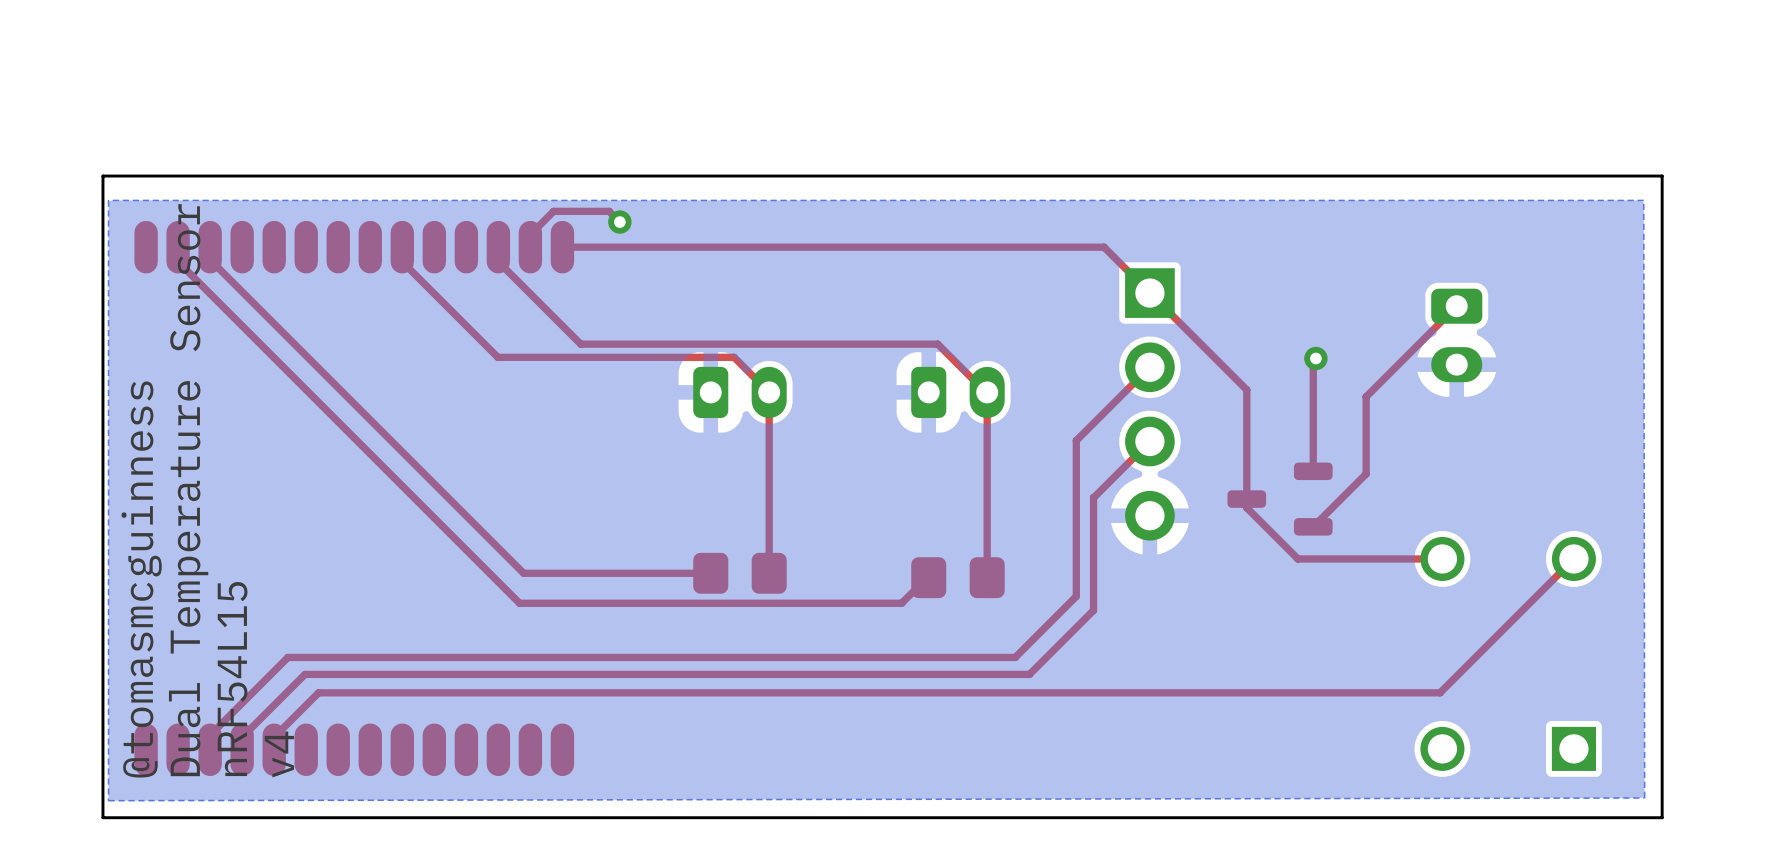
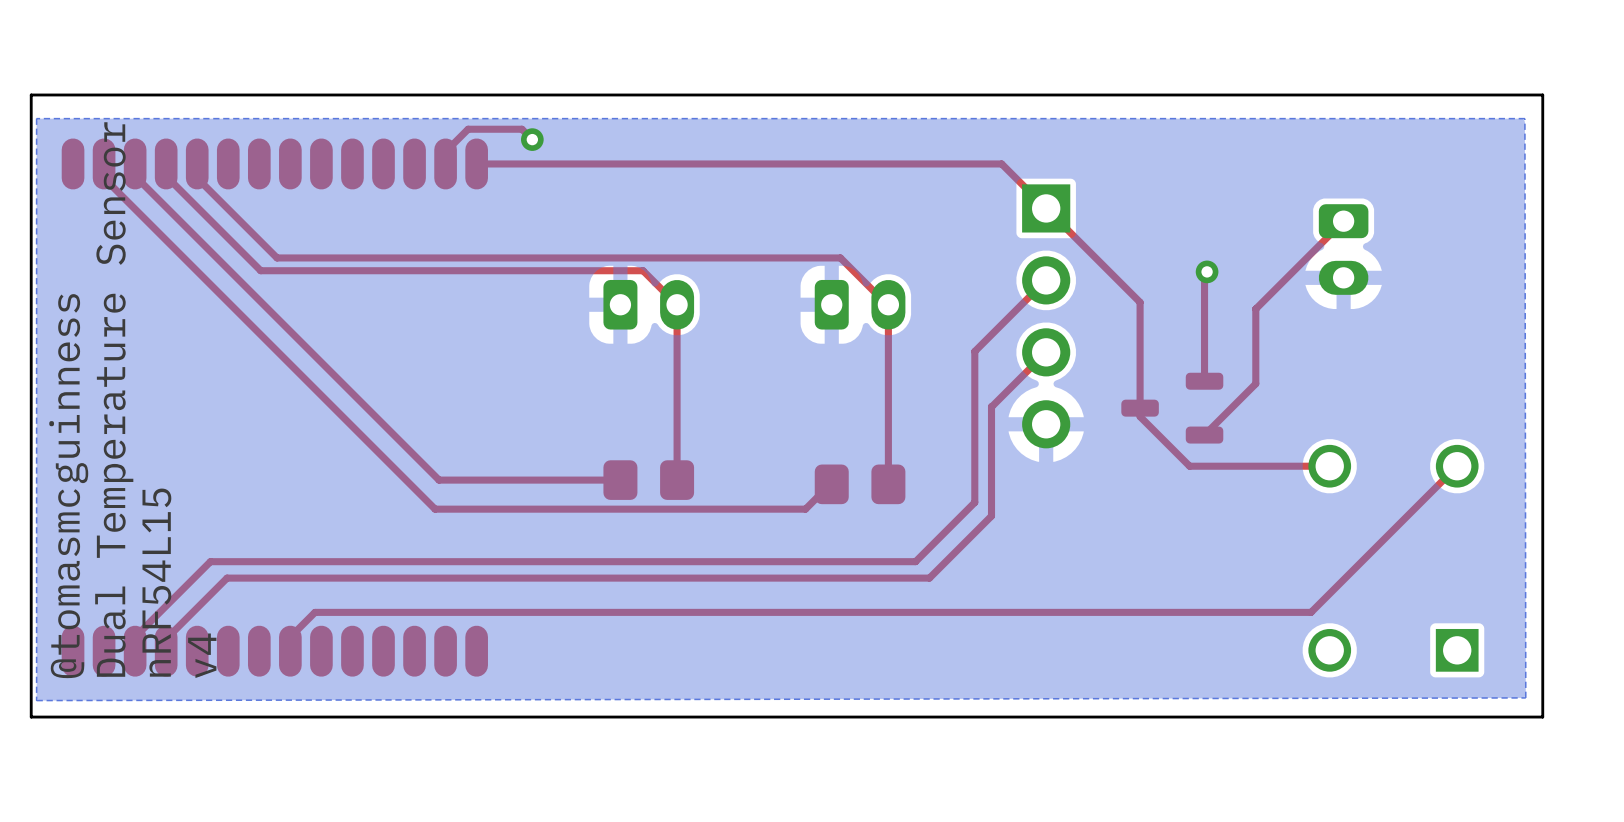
top track: (402, 261) (497, 357) -> (166, 163) (166, 176) (260, 270) (414, 270)
top track: (498, 261) (580, 344) -> (197, 163) (197, 178) (277, 257) (494, 257)
top track: (1440, 692) (318, 692) (274, 737) -> (1327, 595) (1311, 612) (315, 612) (290, 637) (290, 651)

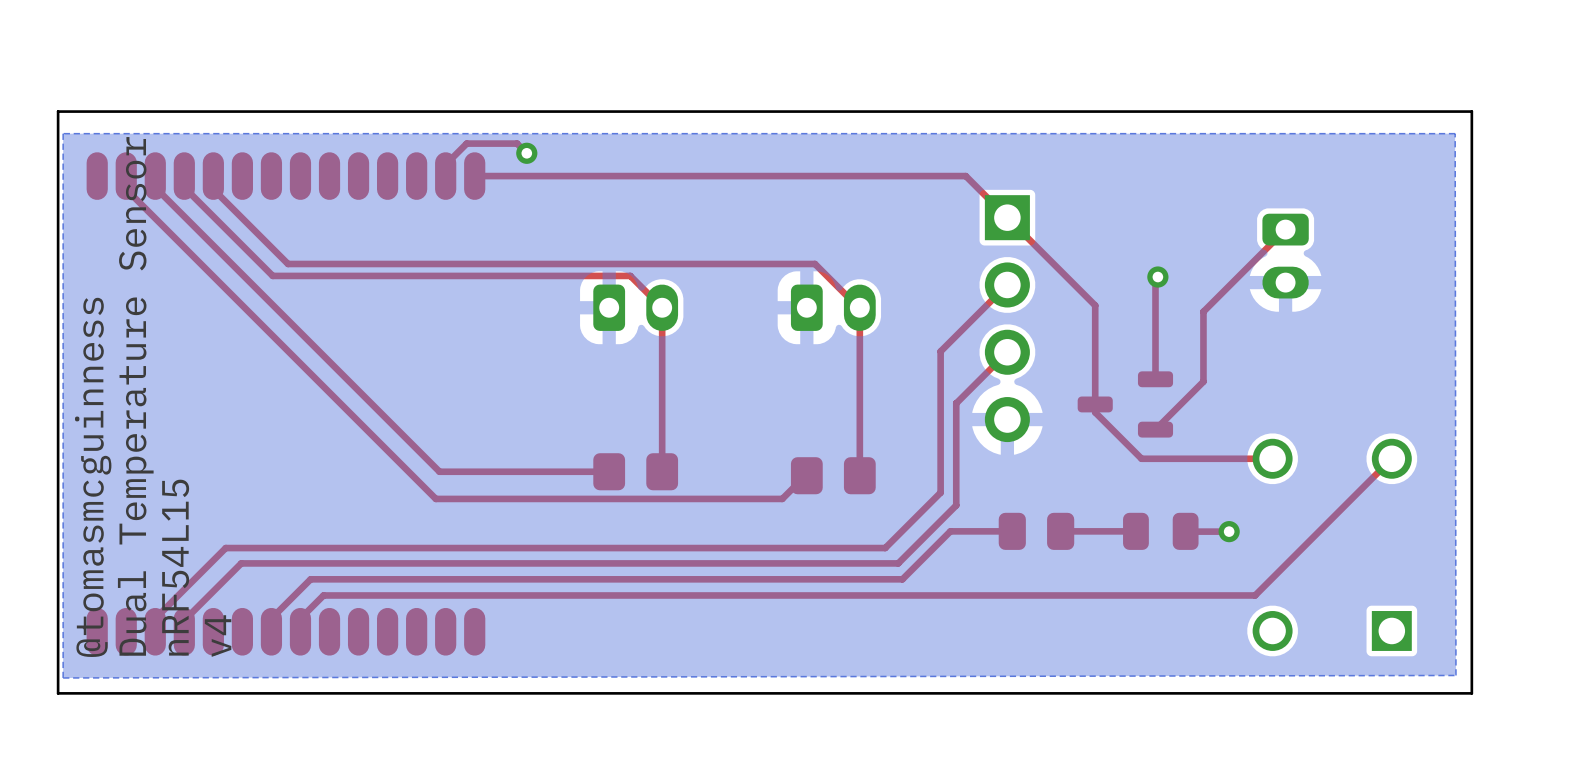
top track: none -> (1012, 531) (950, 531) (902, 579) (310, 579) (271, 618) (271, 631)
part: none -> (1036, 531)
top track: none -> (1135, 531) (1060, 531)
part: none -> (1160, 531)
top track: none -> (1229, 531) (1185, 531)
via: none -> (1229, 531)

